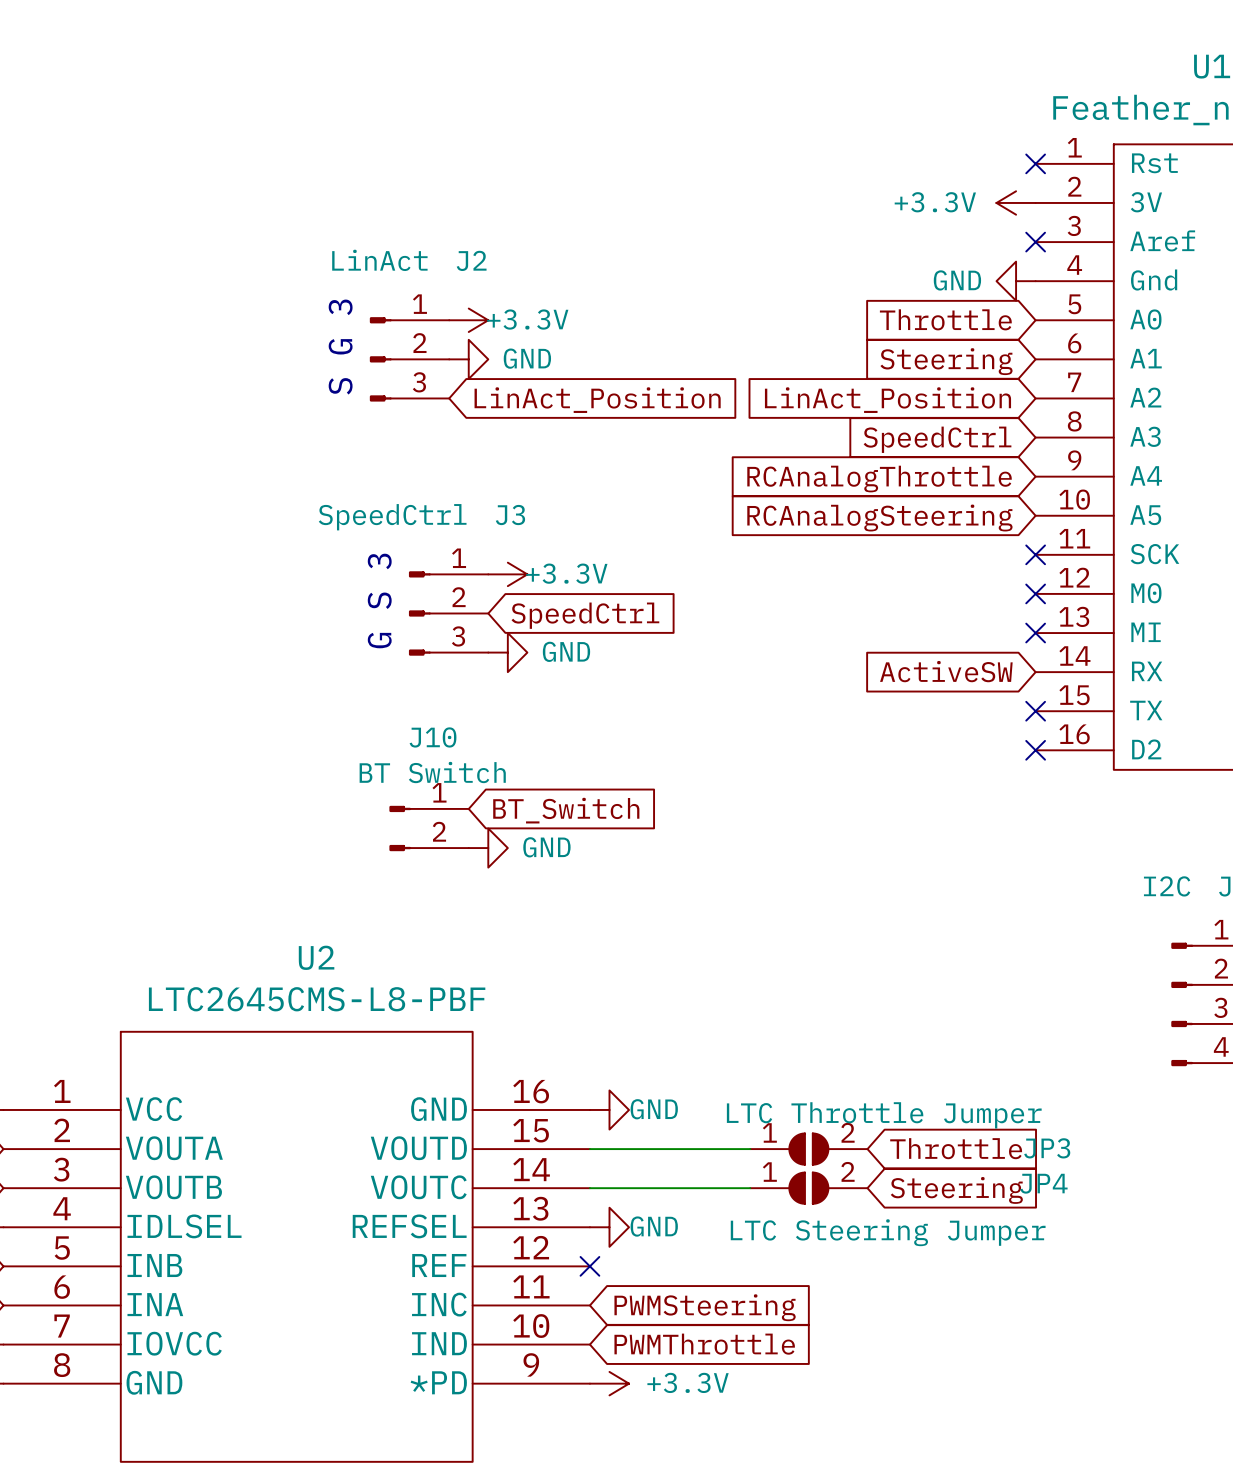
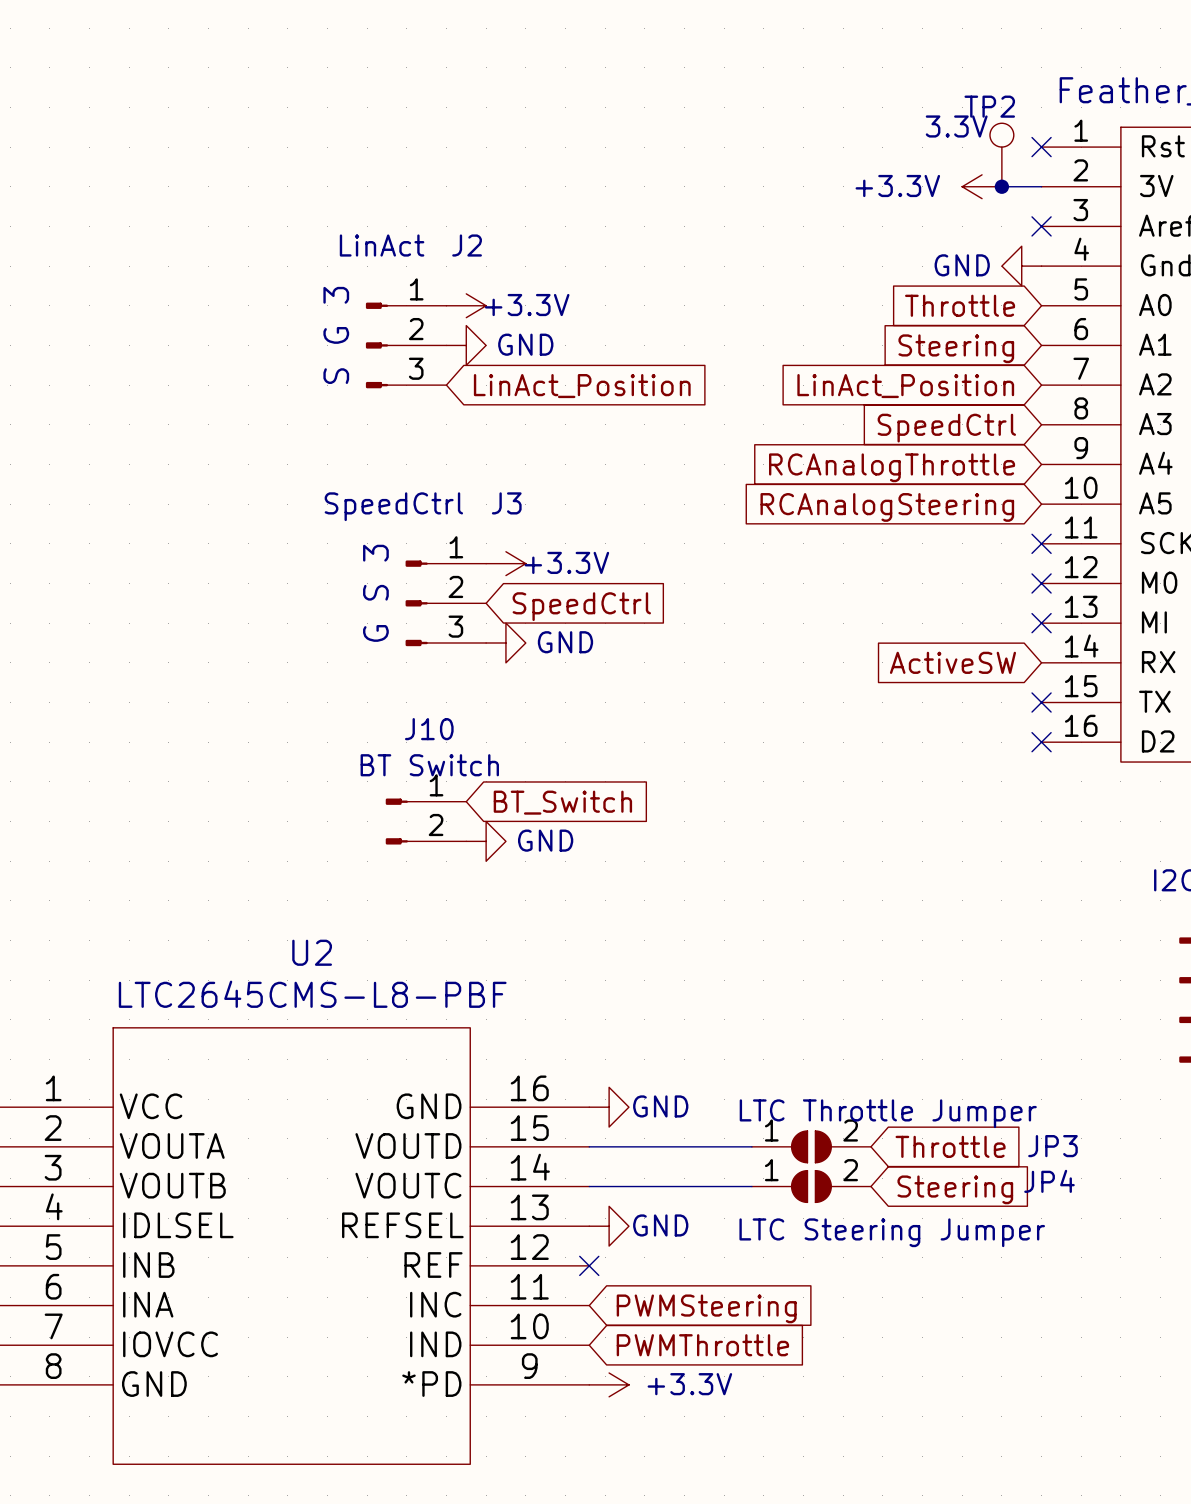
TP2: none -> 3.3V (1001, 155)
junction: none -> (1001, 186)
power symbol position: +3.3V (1016, 202) -> +3.3V (982, 186)

